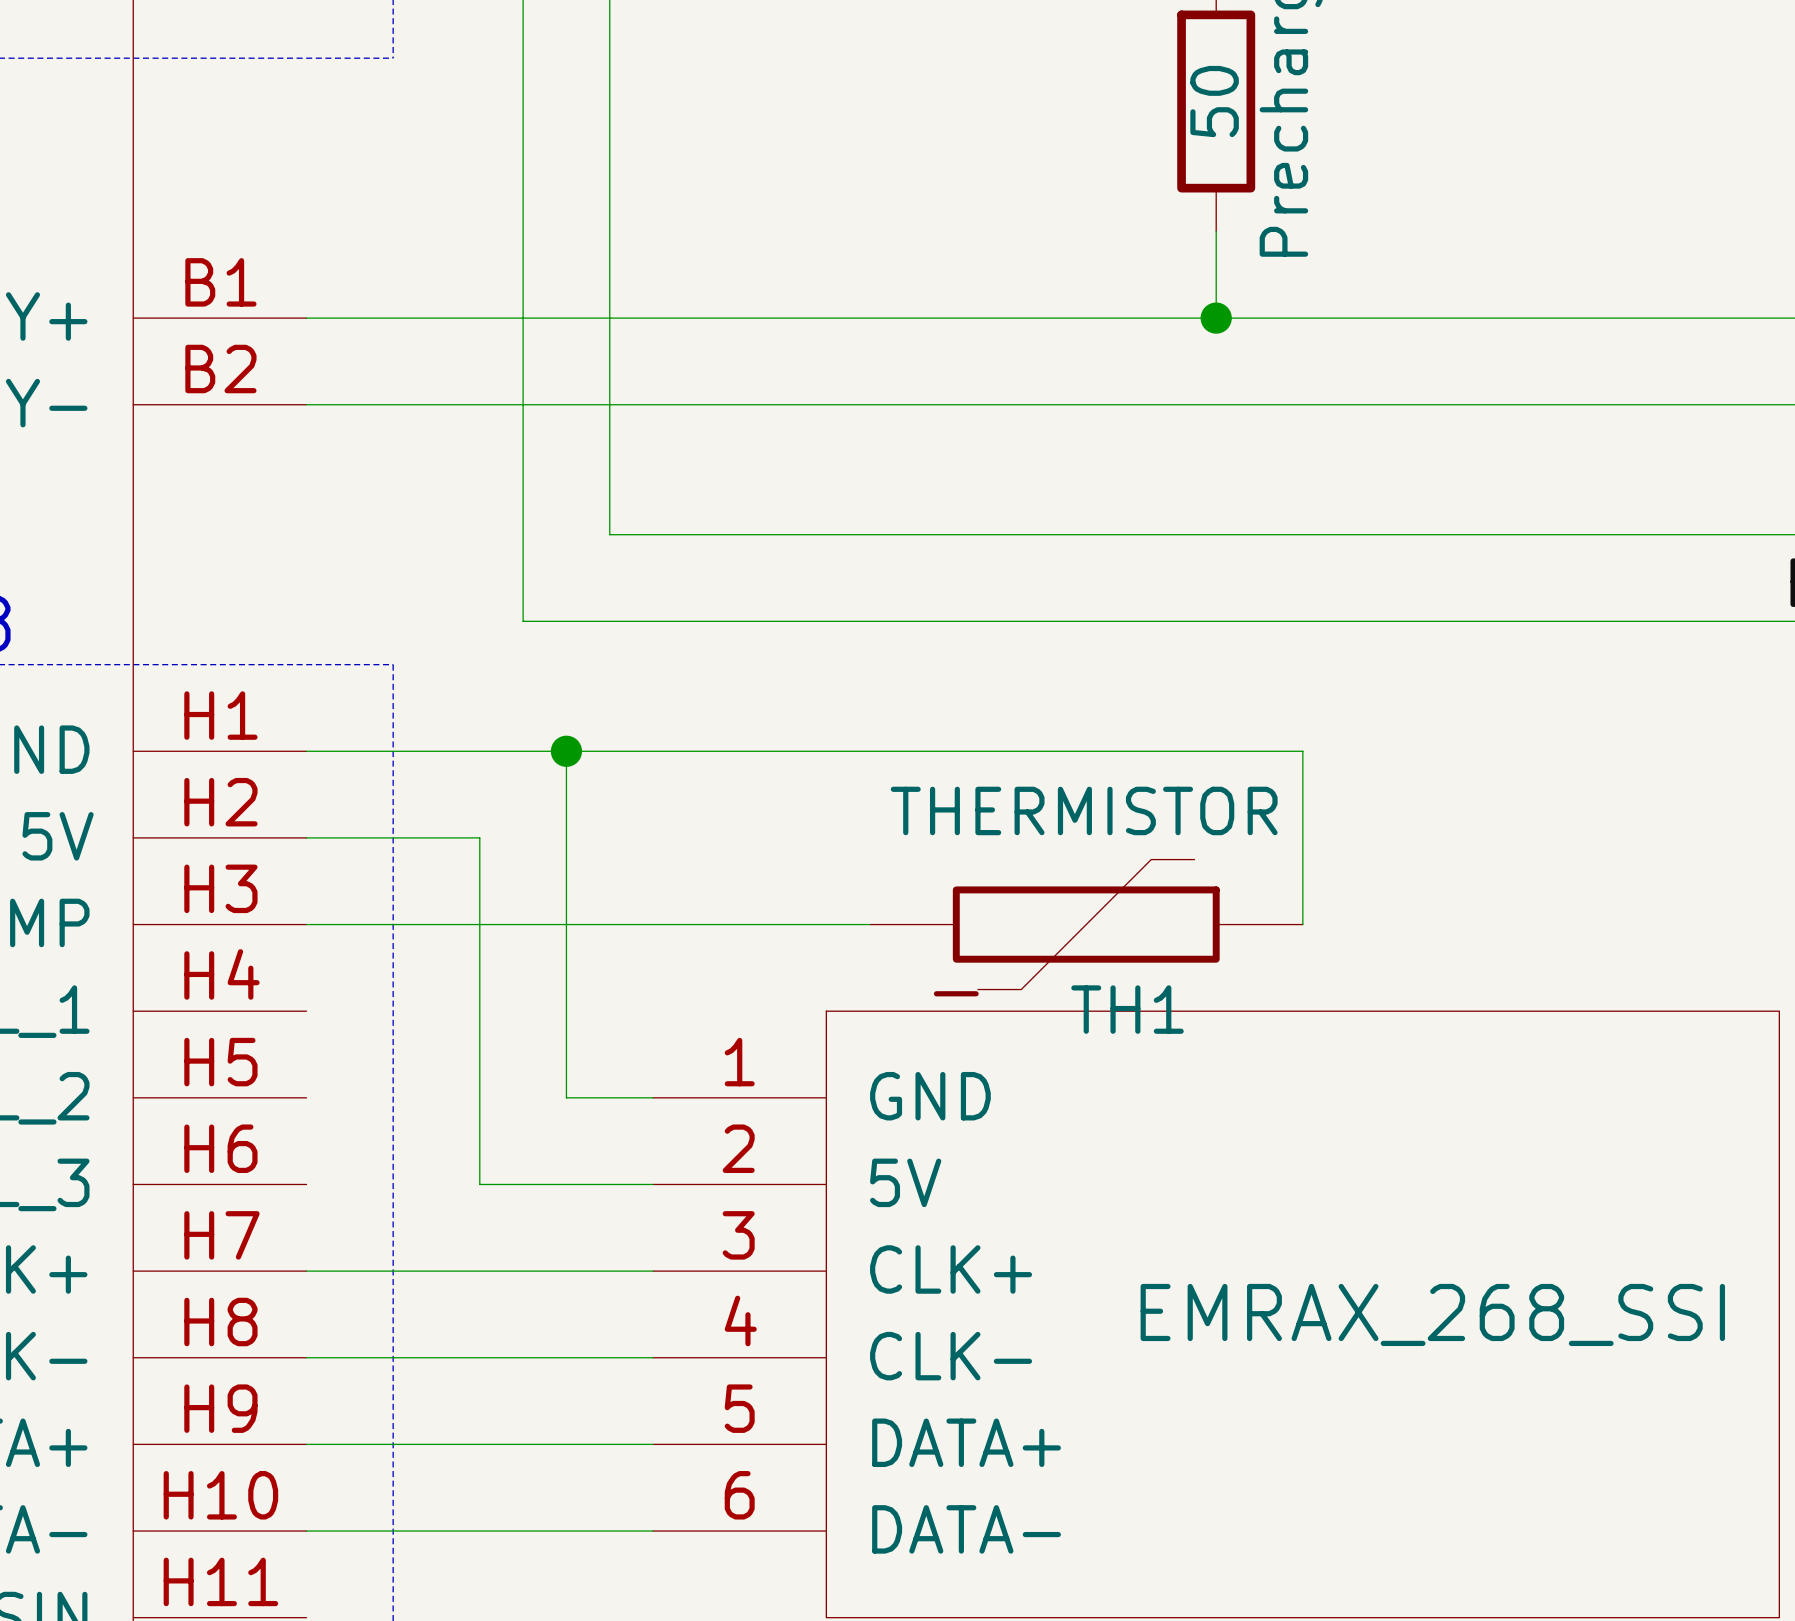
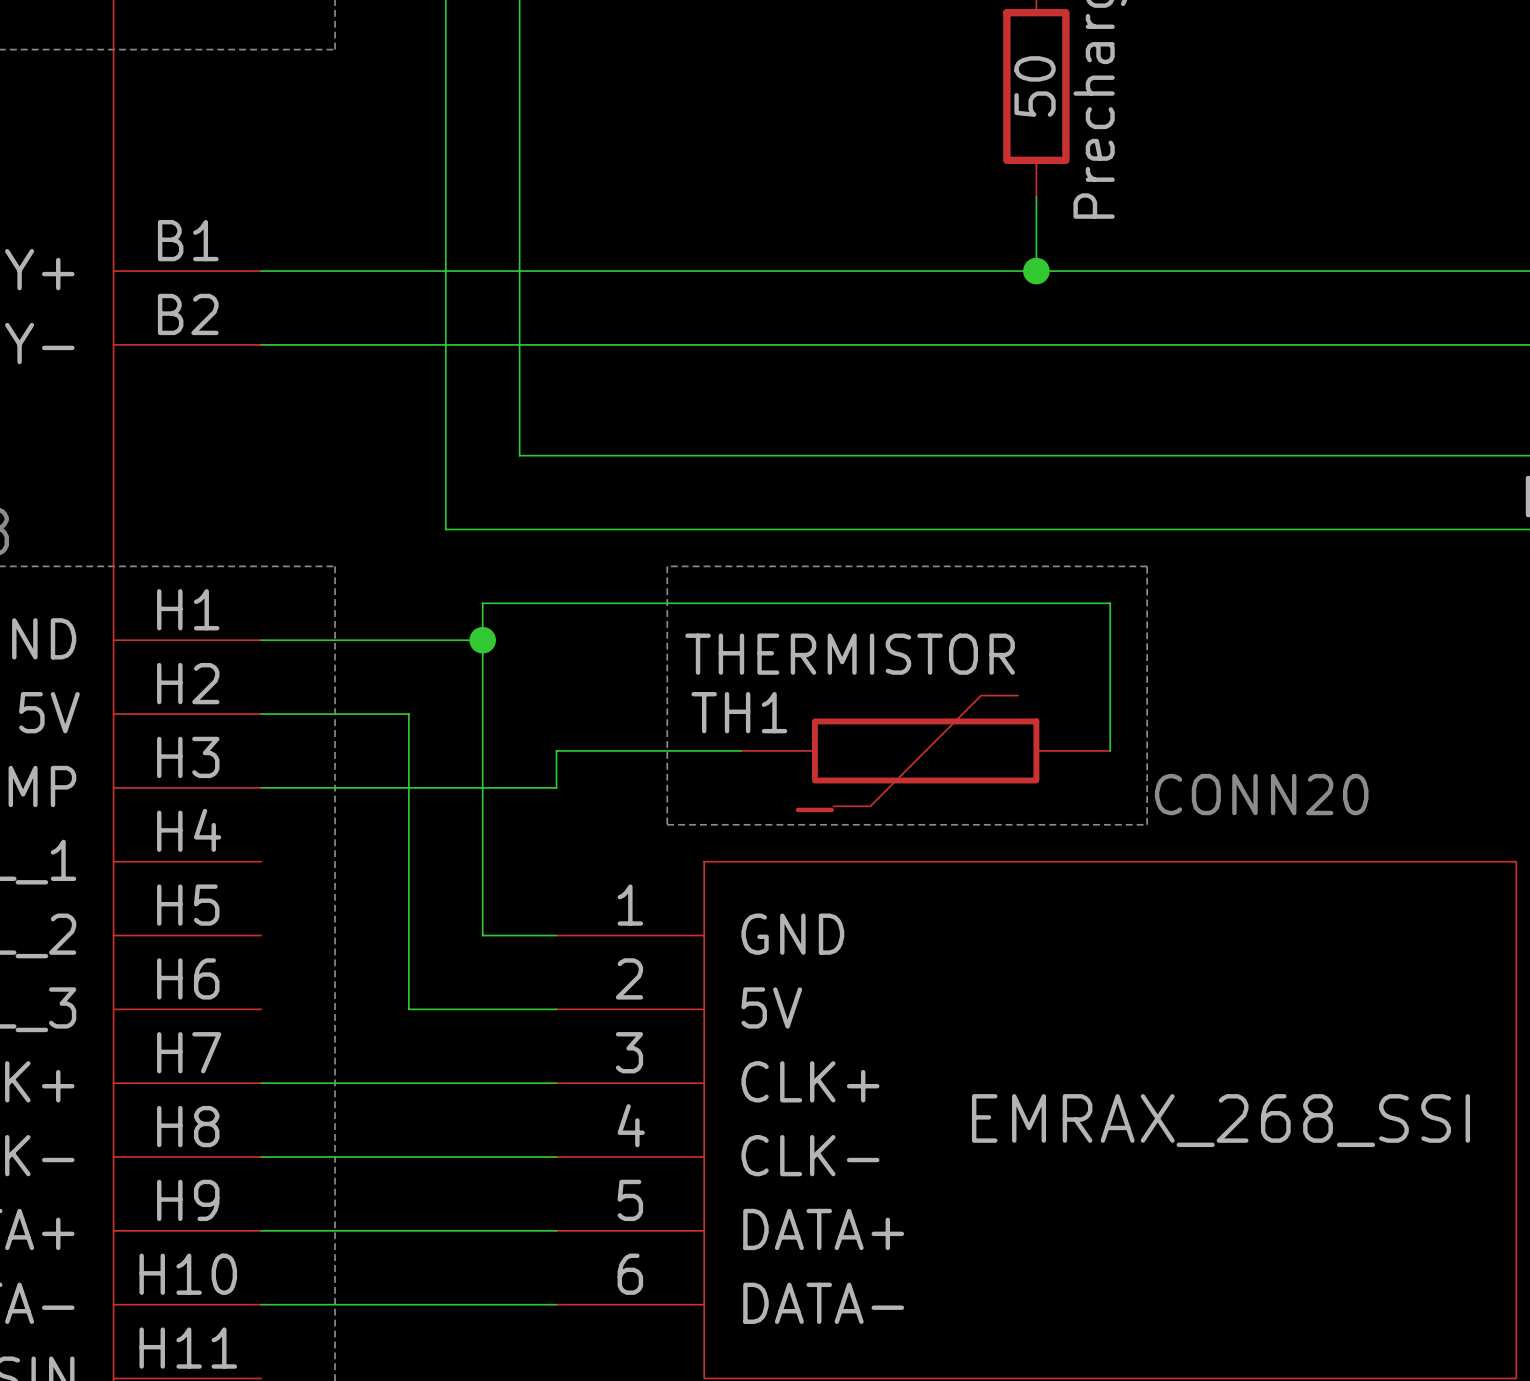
line: none -> (667, 566) (667, 824) (1147, 824) (1147, 566) (667, 566)
wire: (566, 751) (1302, 751) -> (482, 640) (482, 603) (1110, 603) (1110, 640)
TH1 value position: THERMISTOR (1084, 810) -> THERMISTOR (850, 654)
wire: (1302, 881) (1302, 924) -> none
wire: (653, 924) (869, 924) -> (556, 787) (556, 750) (741, 750)
TH1 position: (1086, 924) -> (925, 750)
text: none -> CONN20 (1261, 794)
TH1 name position: TH1 (1127, 1009) -> TH1 (739, 712)

